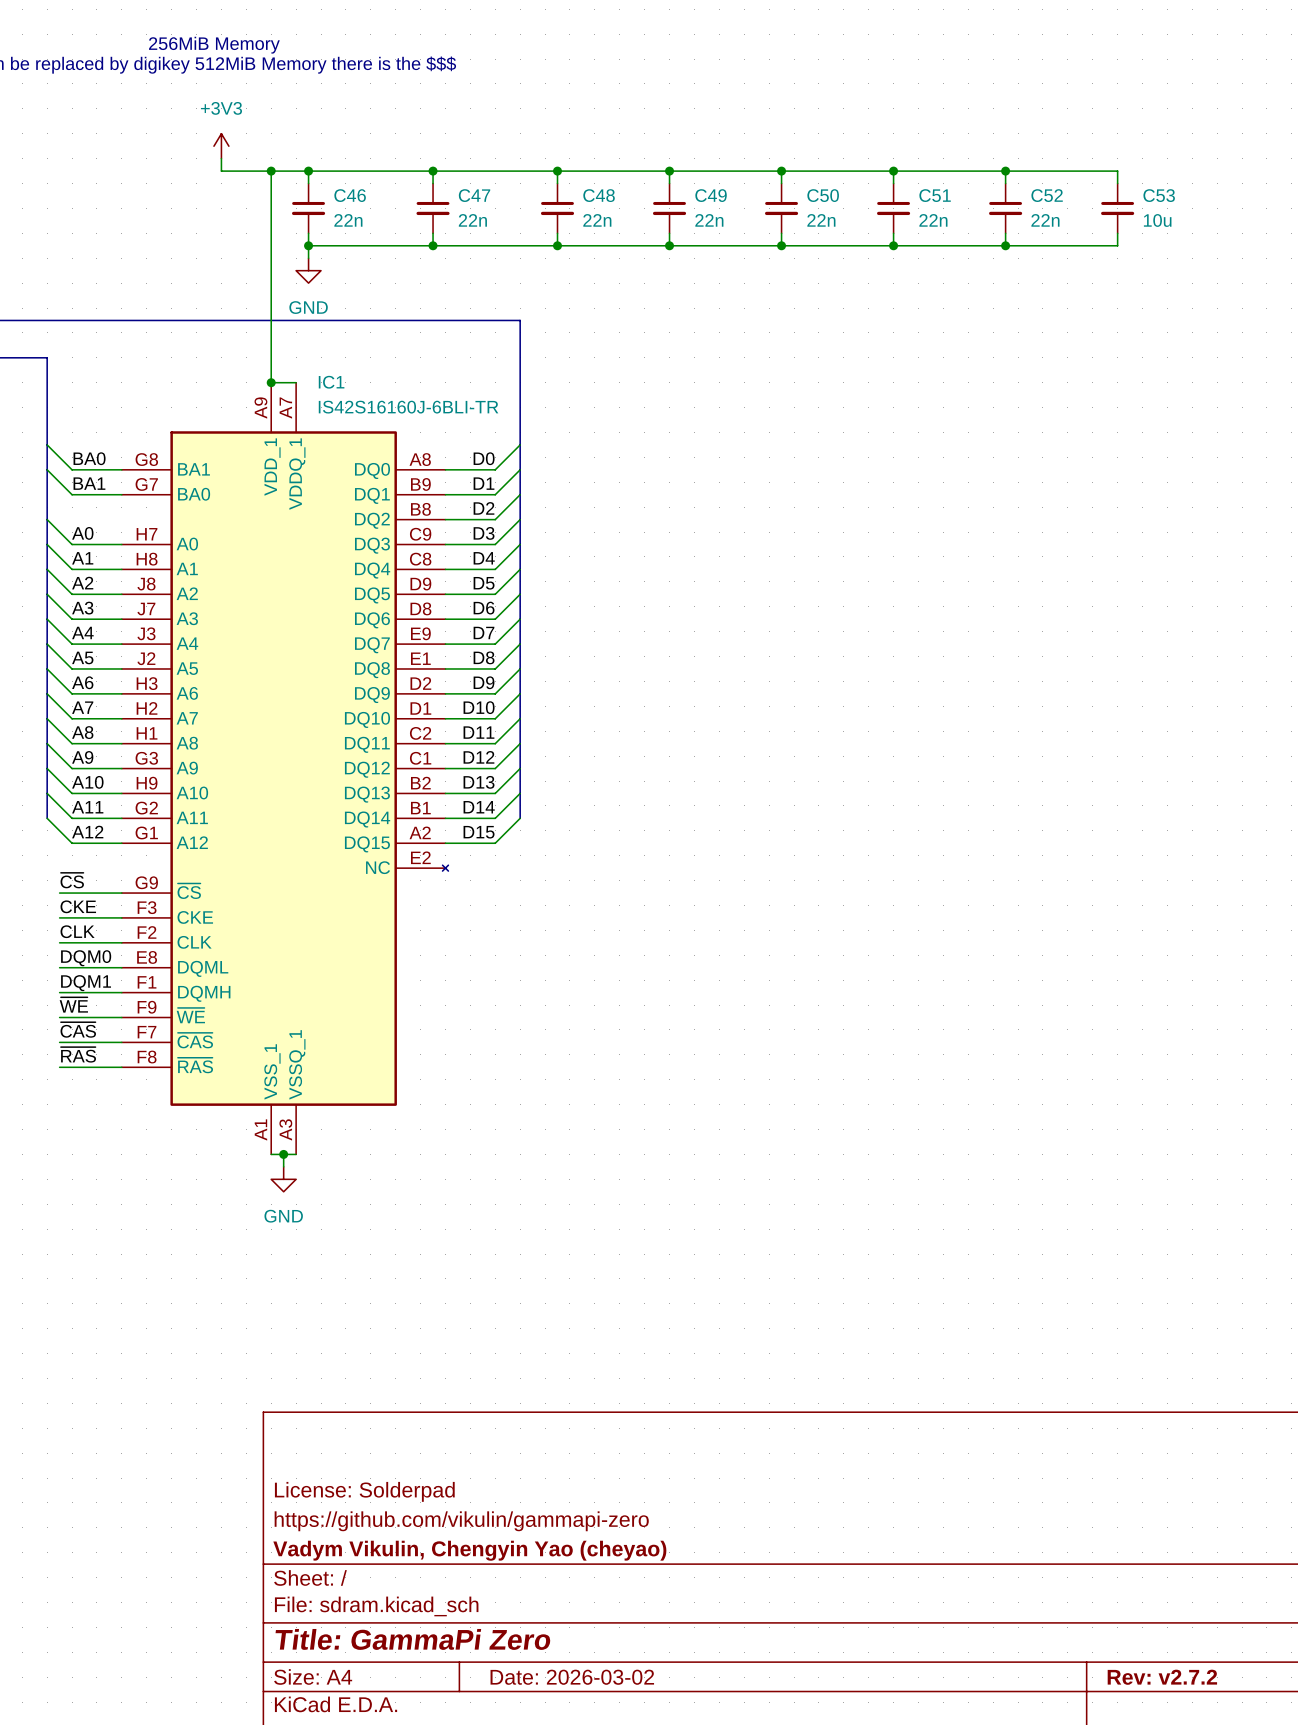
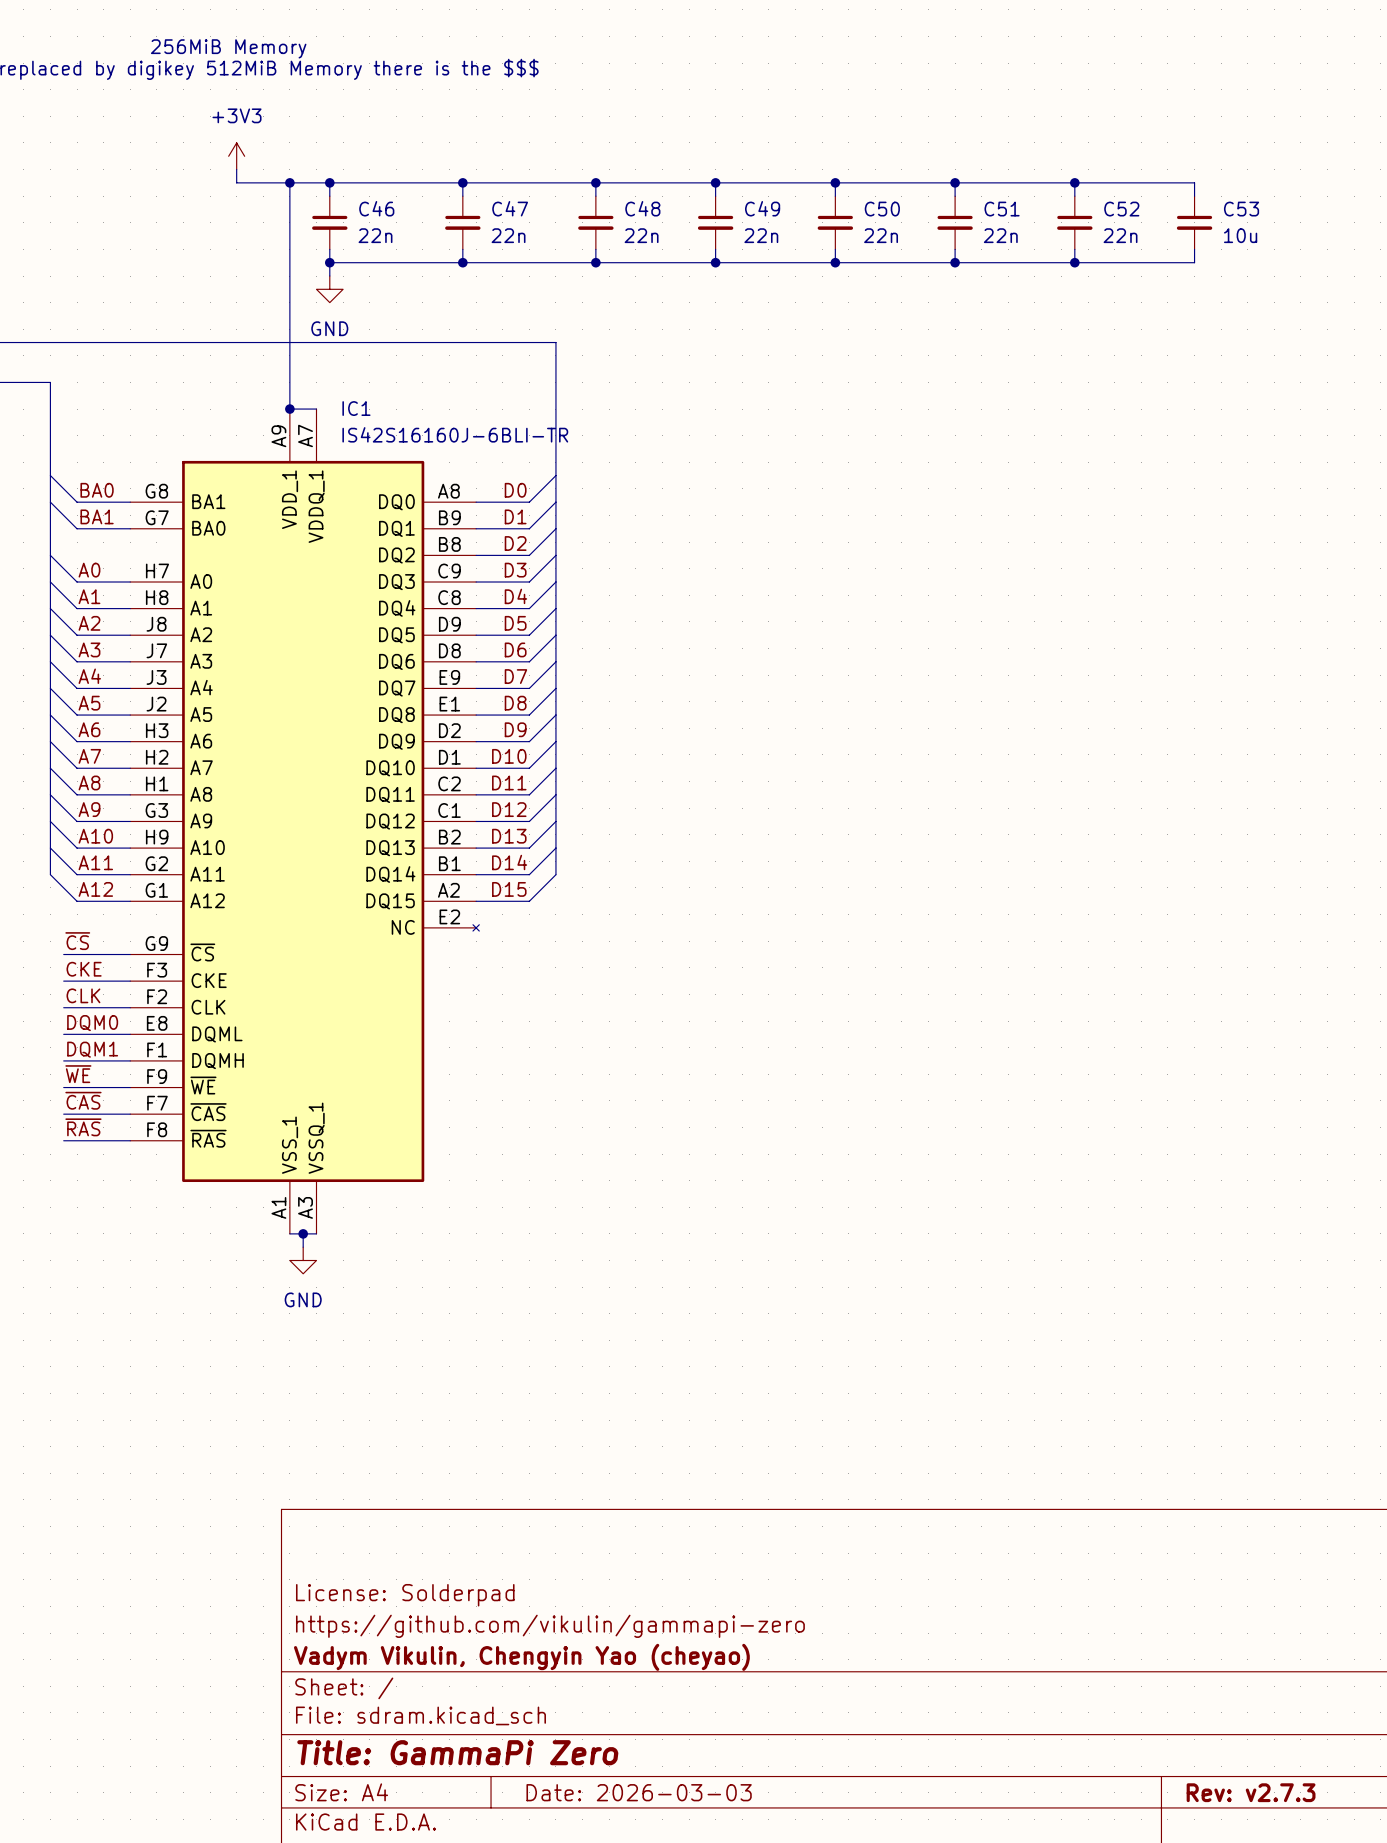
title block: Date: 2026-03-02 (572, 1677) -> Date: 2026-03-03 (639, 1792)
title block: Rev: v2.7.2 (1162, 1677) -> Rev: v2.7.3 (1251, 1792)

